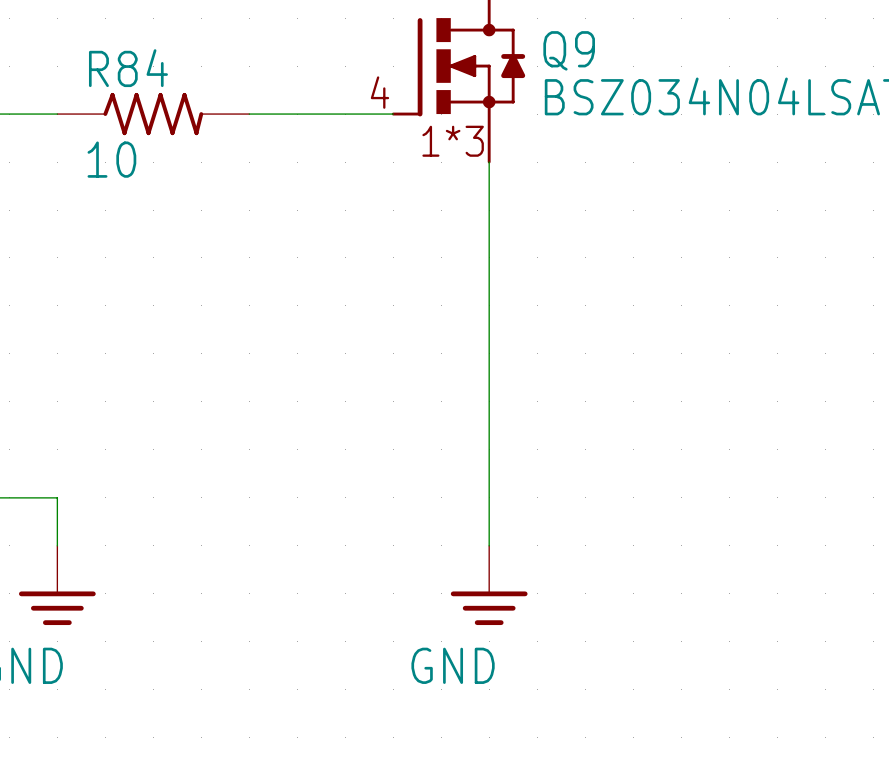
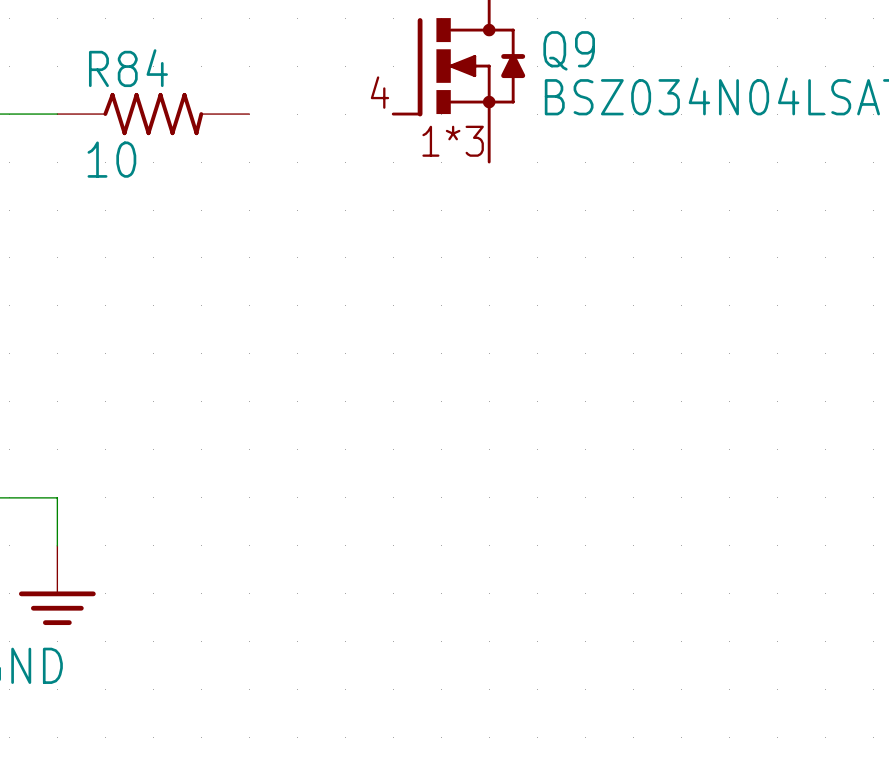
wire: (249, 114) (393, 114) -> none
wire: (489, 162) (489, 545) -> none
power symbol: GND (489, 585) -> none

